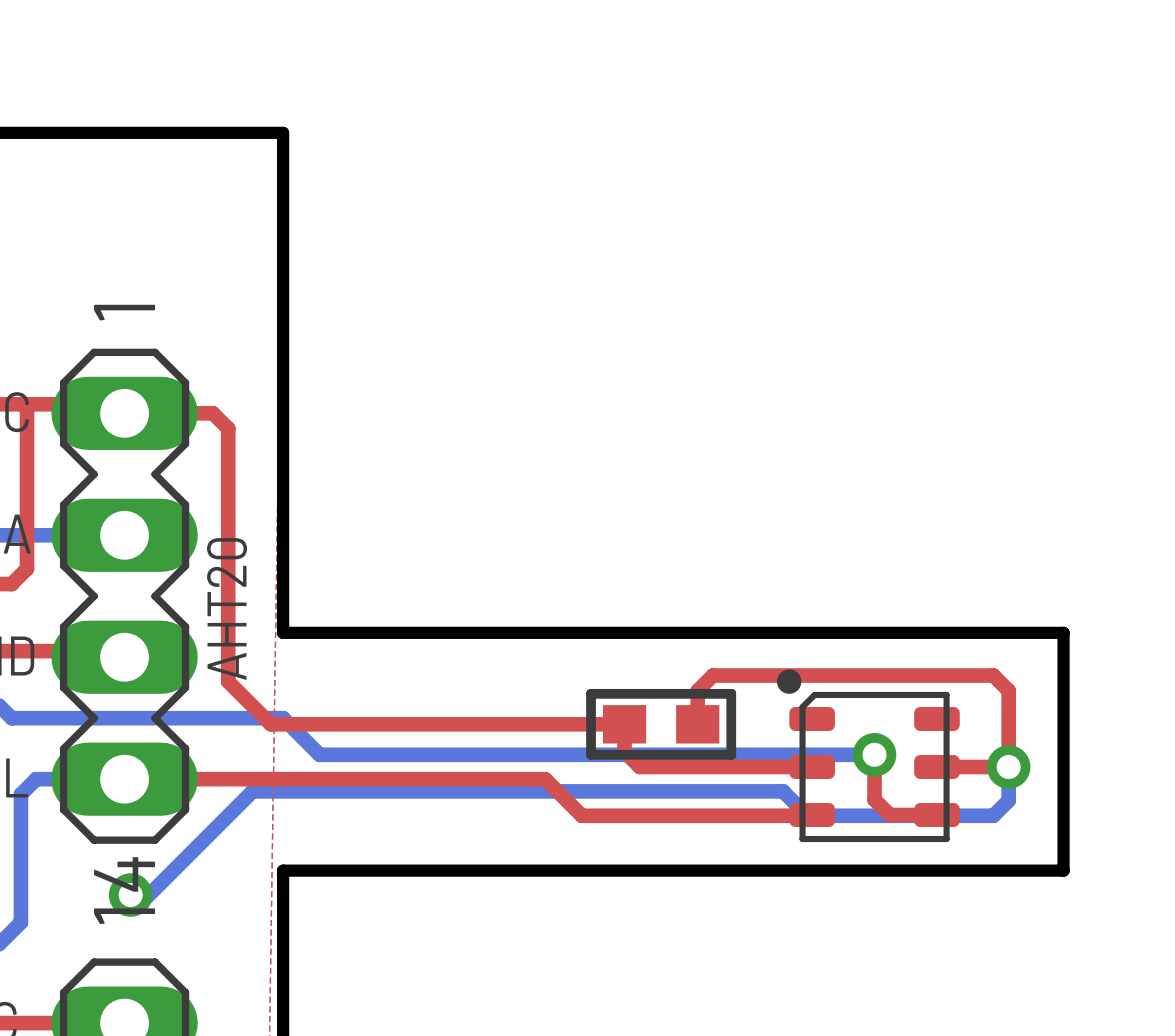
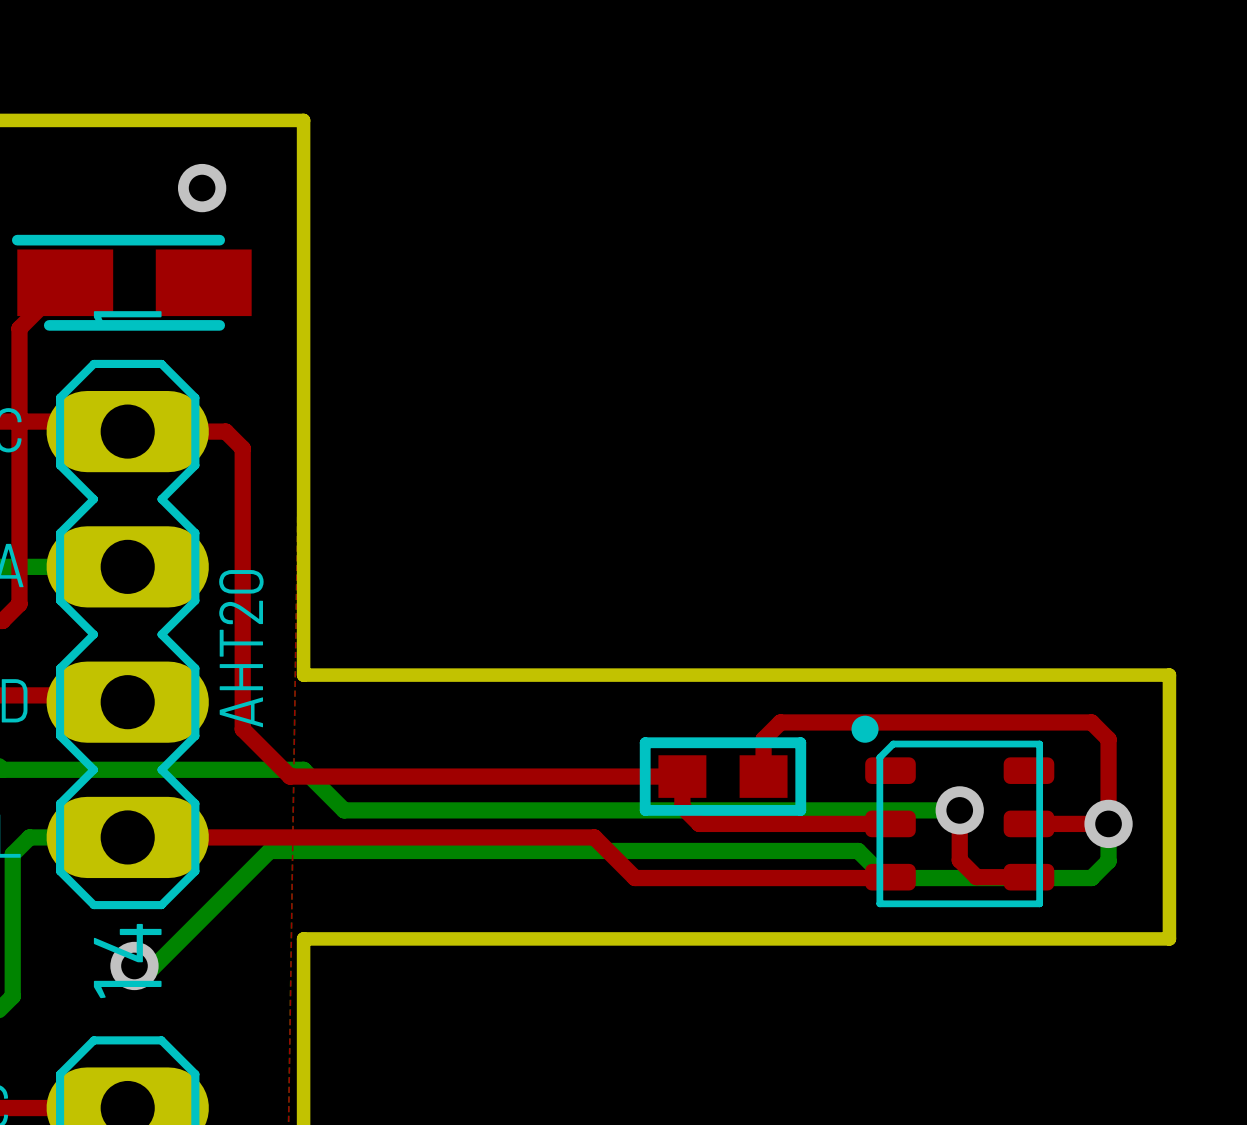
via: none -> (202, 188)
top track: none -> (65, 282) (19, 328) (19, 421)
part: none -> (131, 282)

